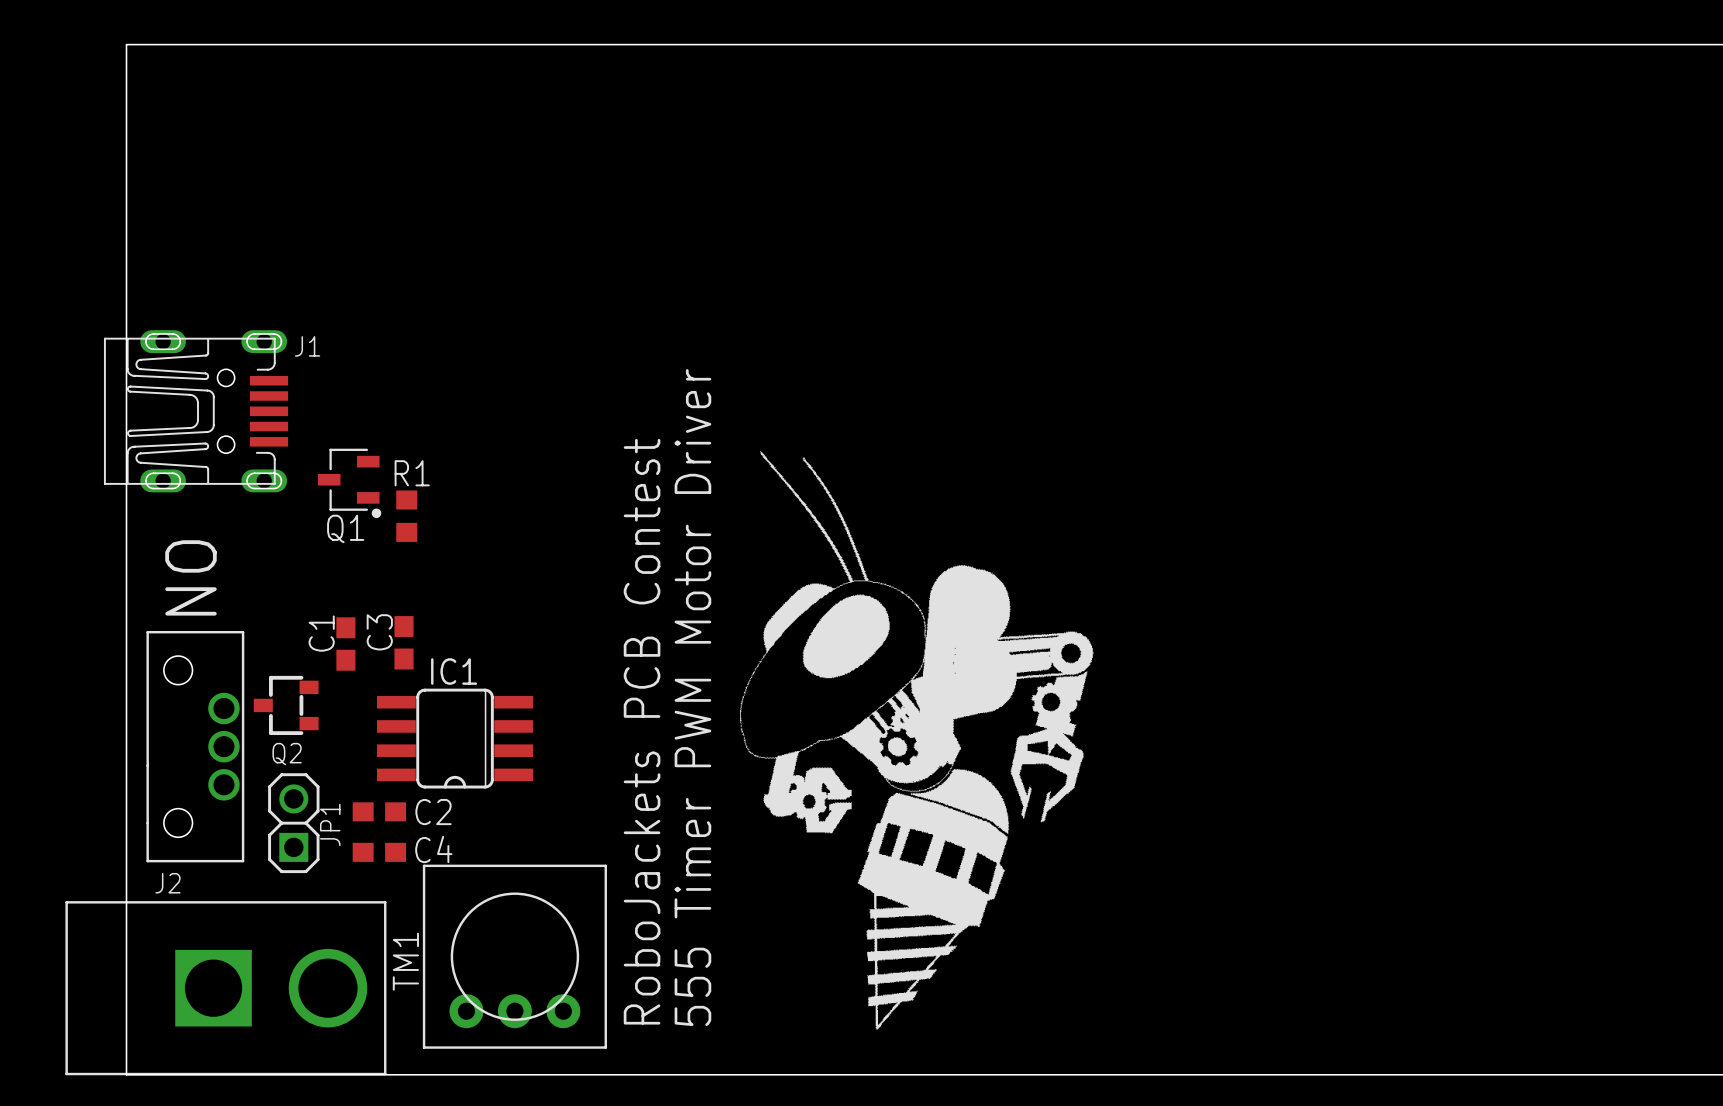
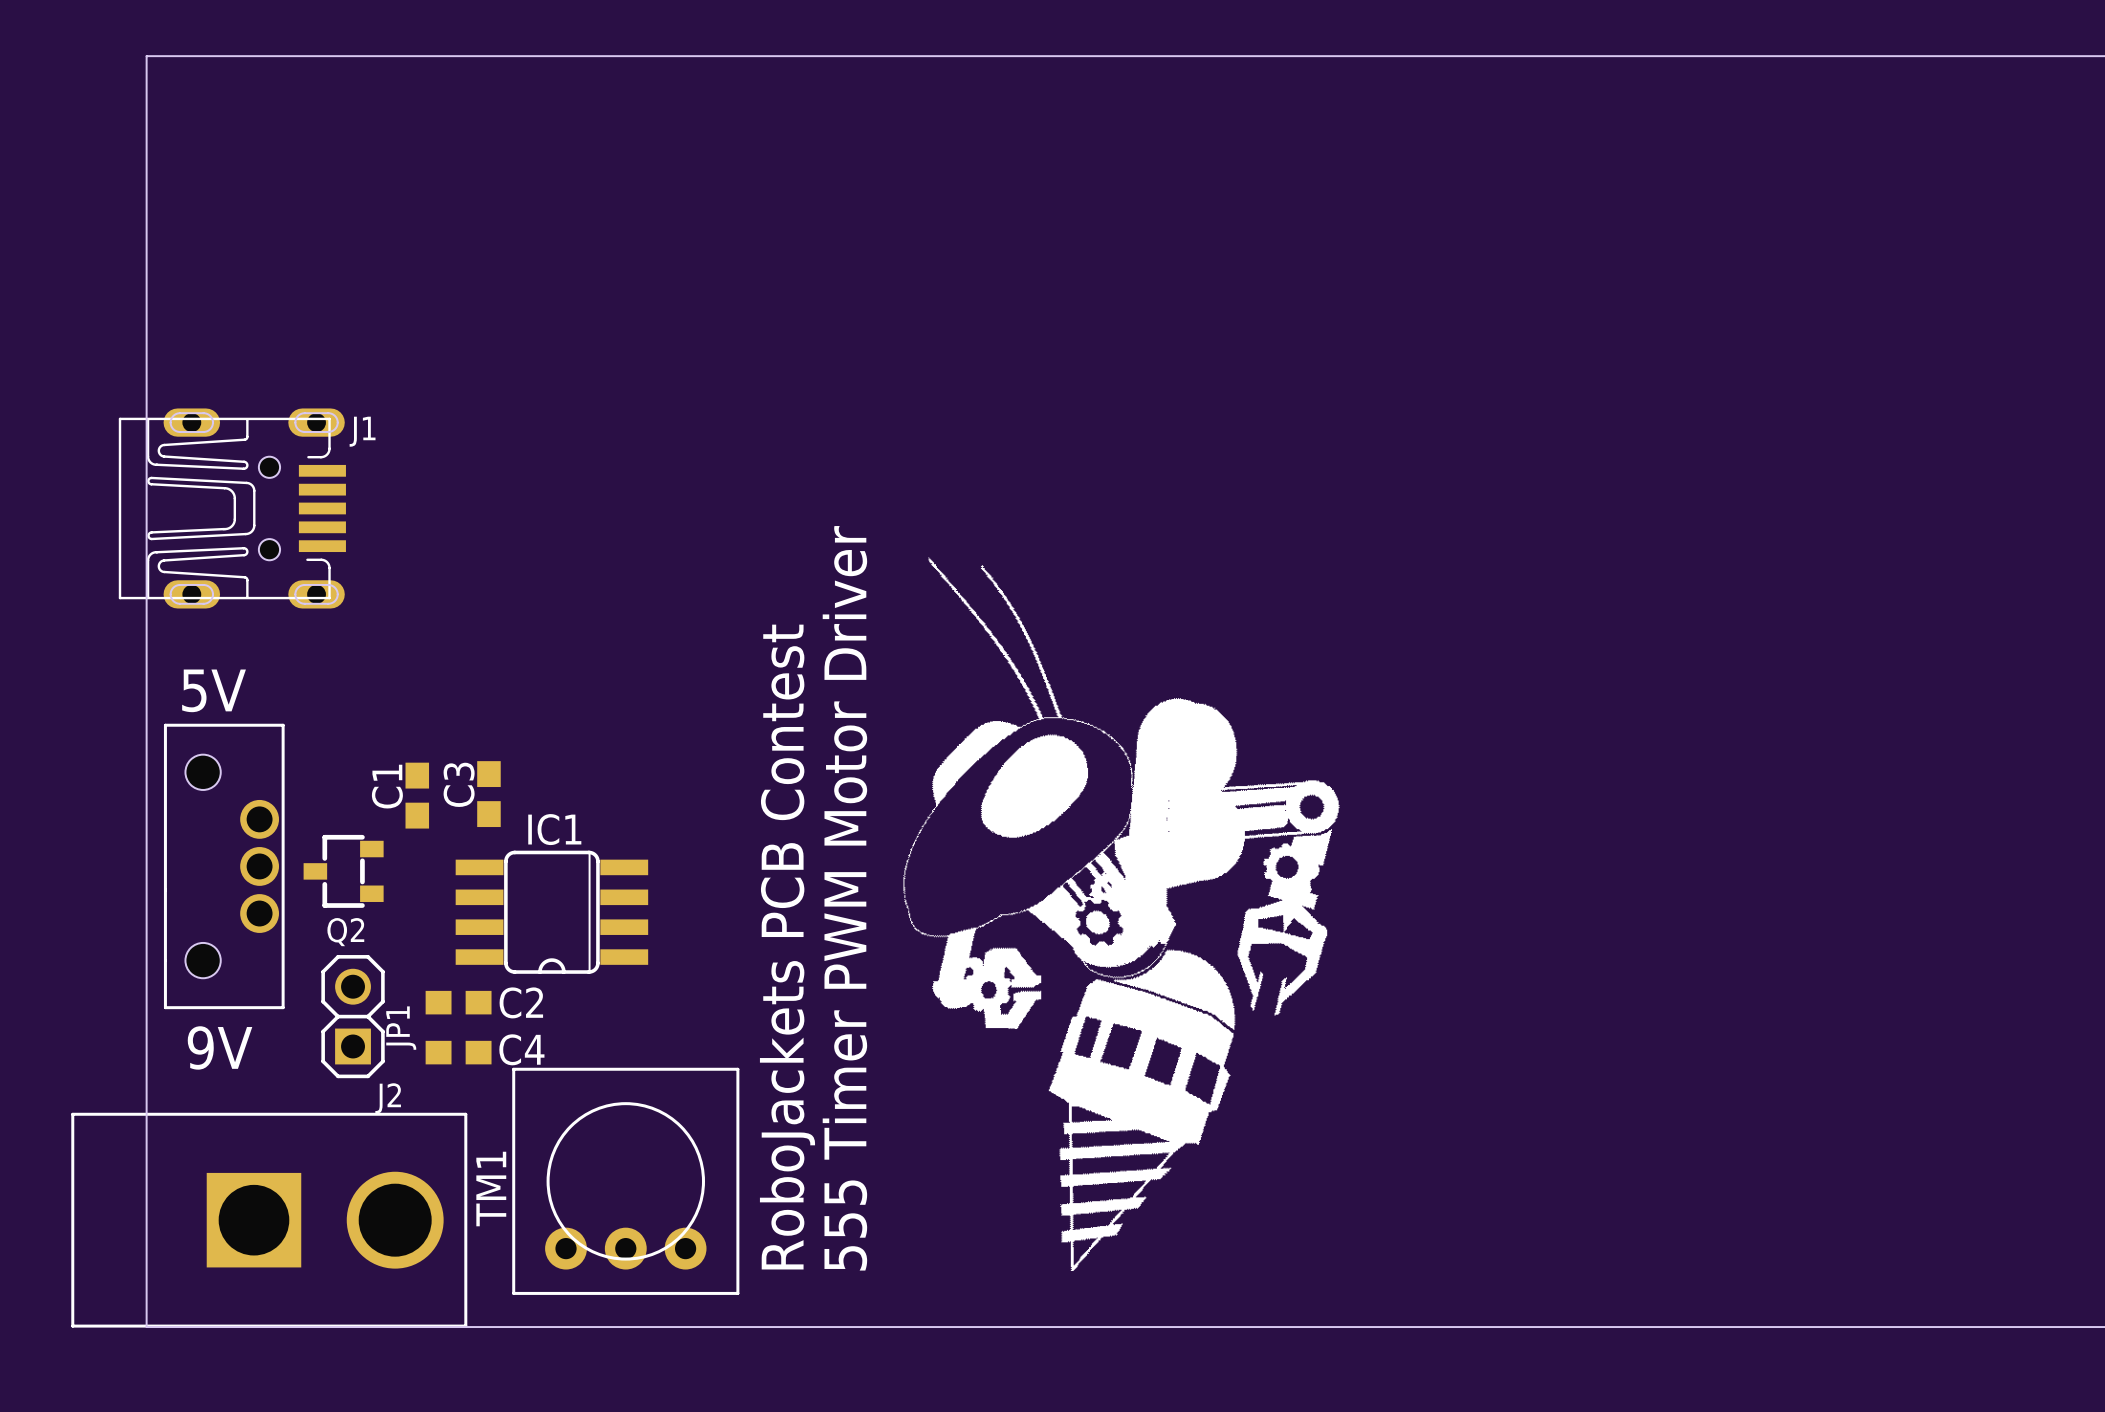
Q1: (349, 483) -> none
R1: (406, 516) -> none
text: none -> 5V (214, 690)
text: ON (190, 577) -> none
part position: (195, 746) -> (224, 866)
text: none -> 9V (220, 1047)
J2 name position: J2 (167, 883) -> J2 (388, 1098)

